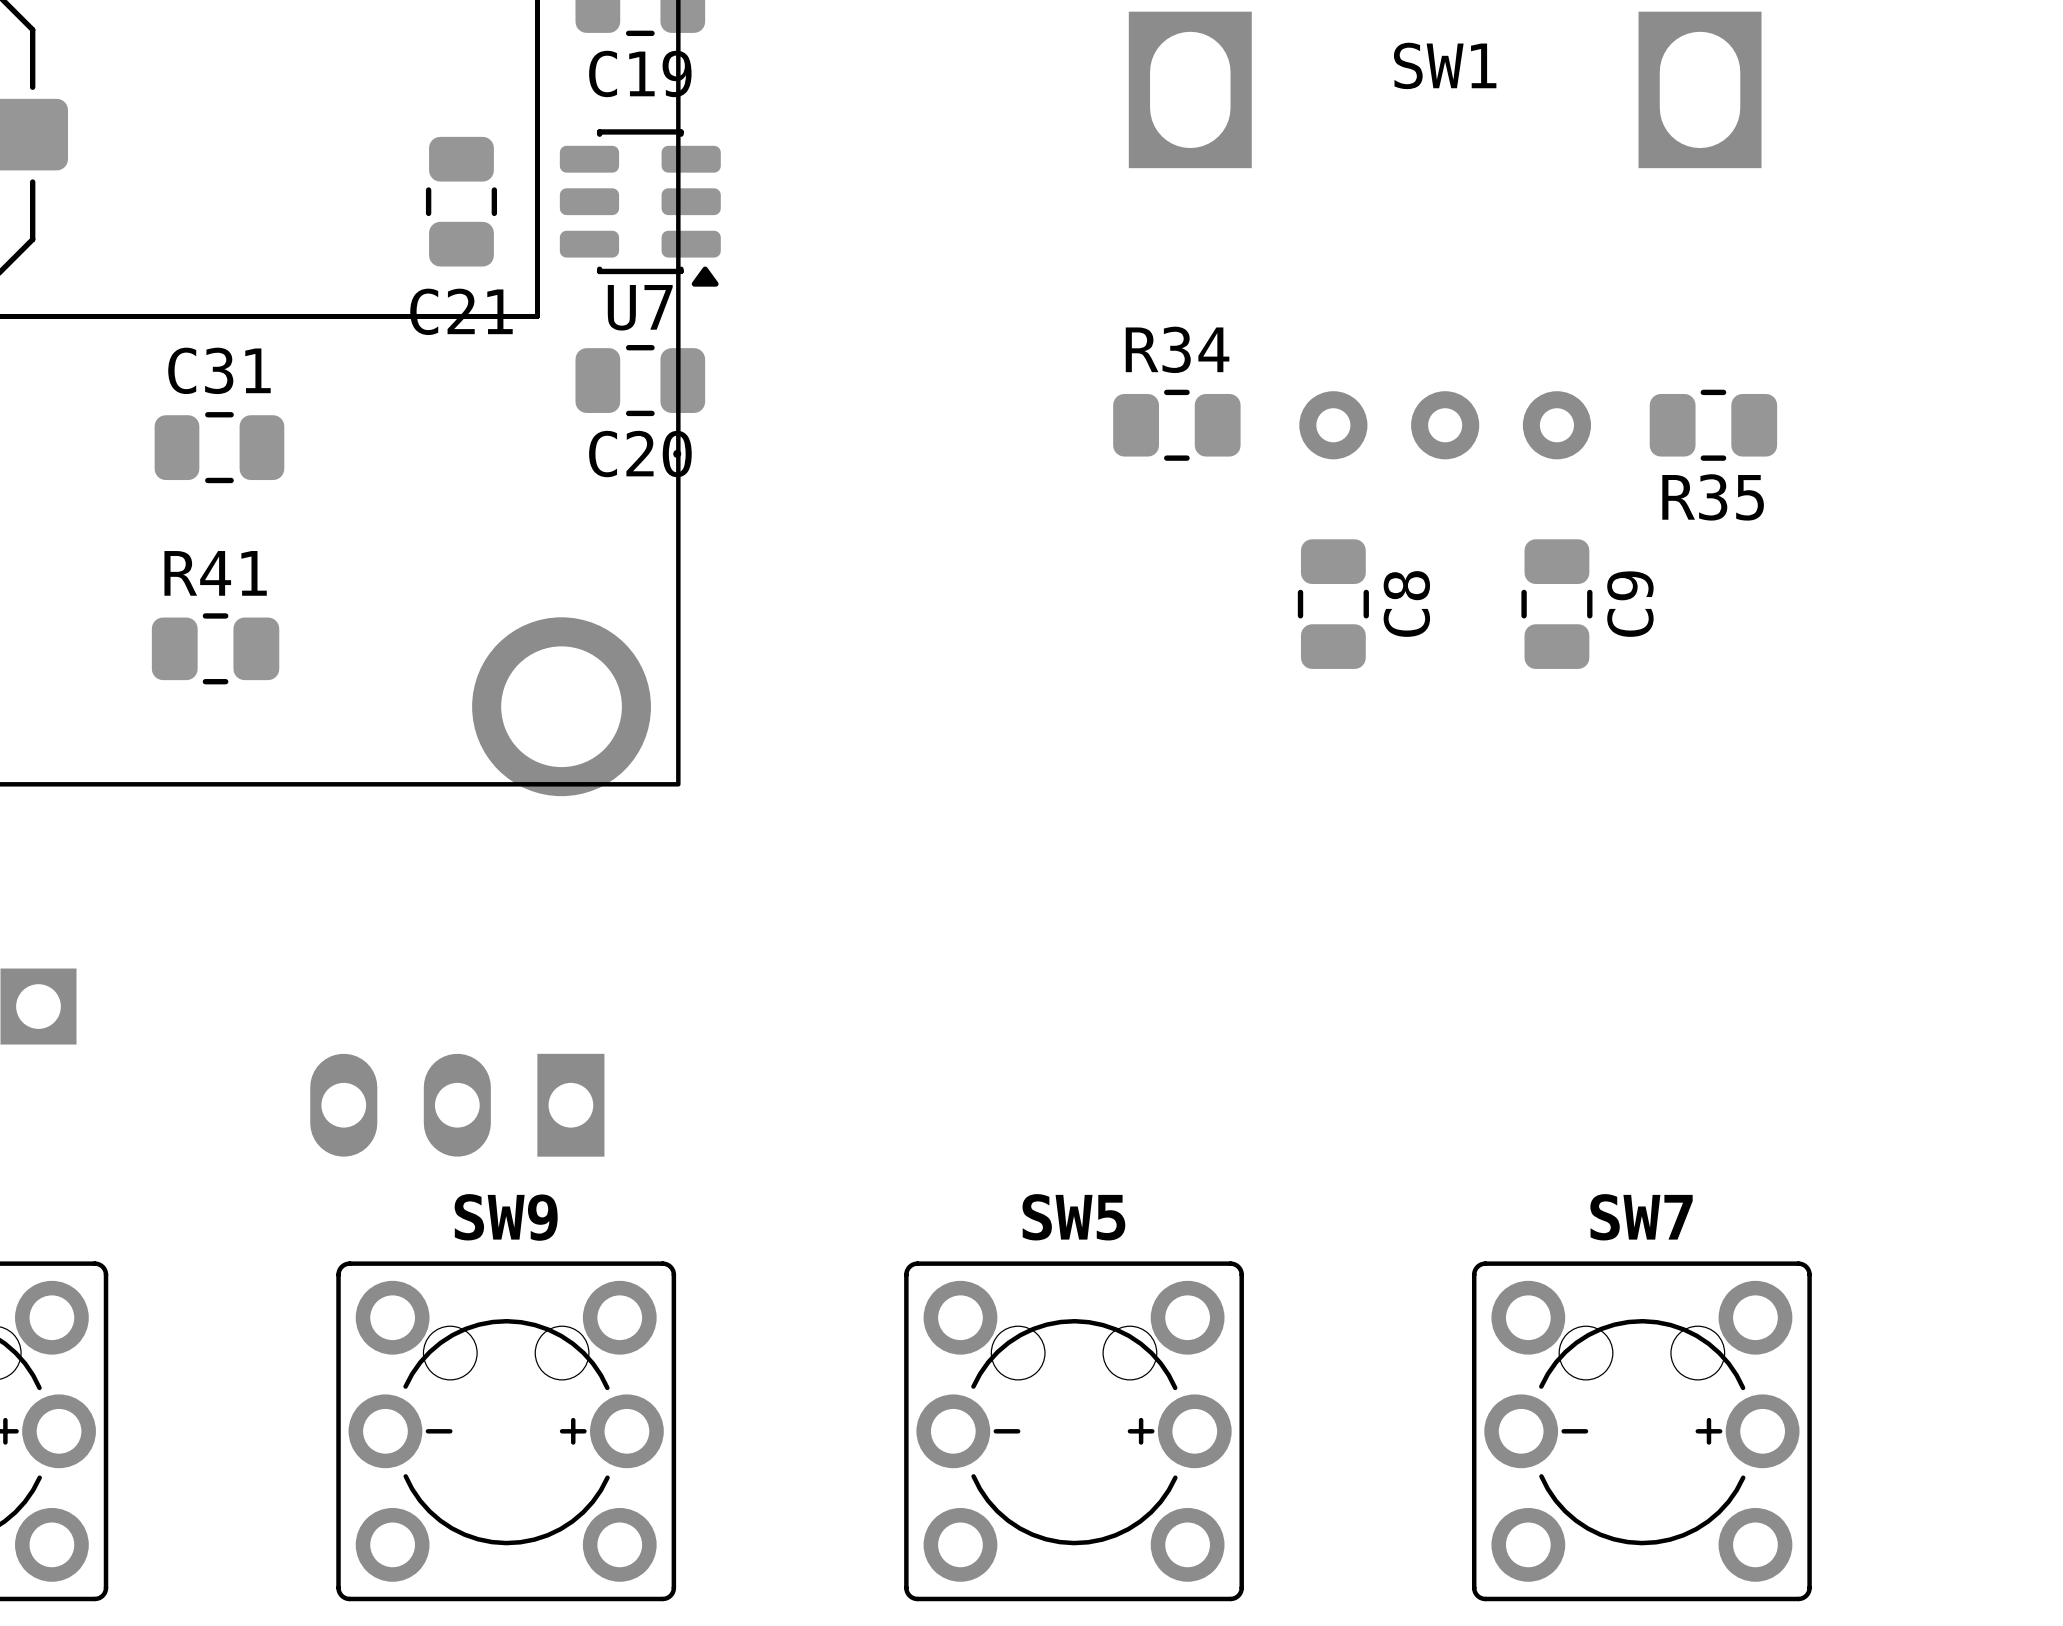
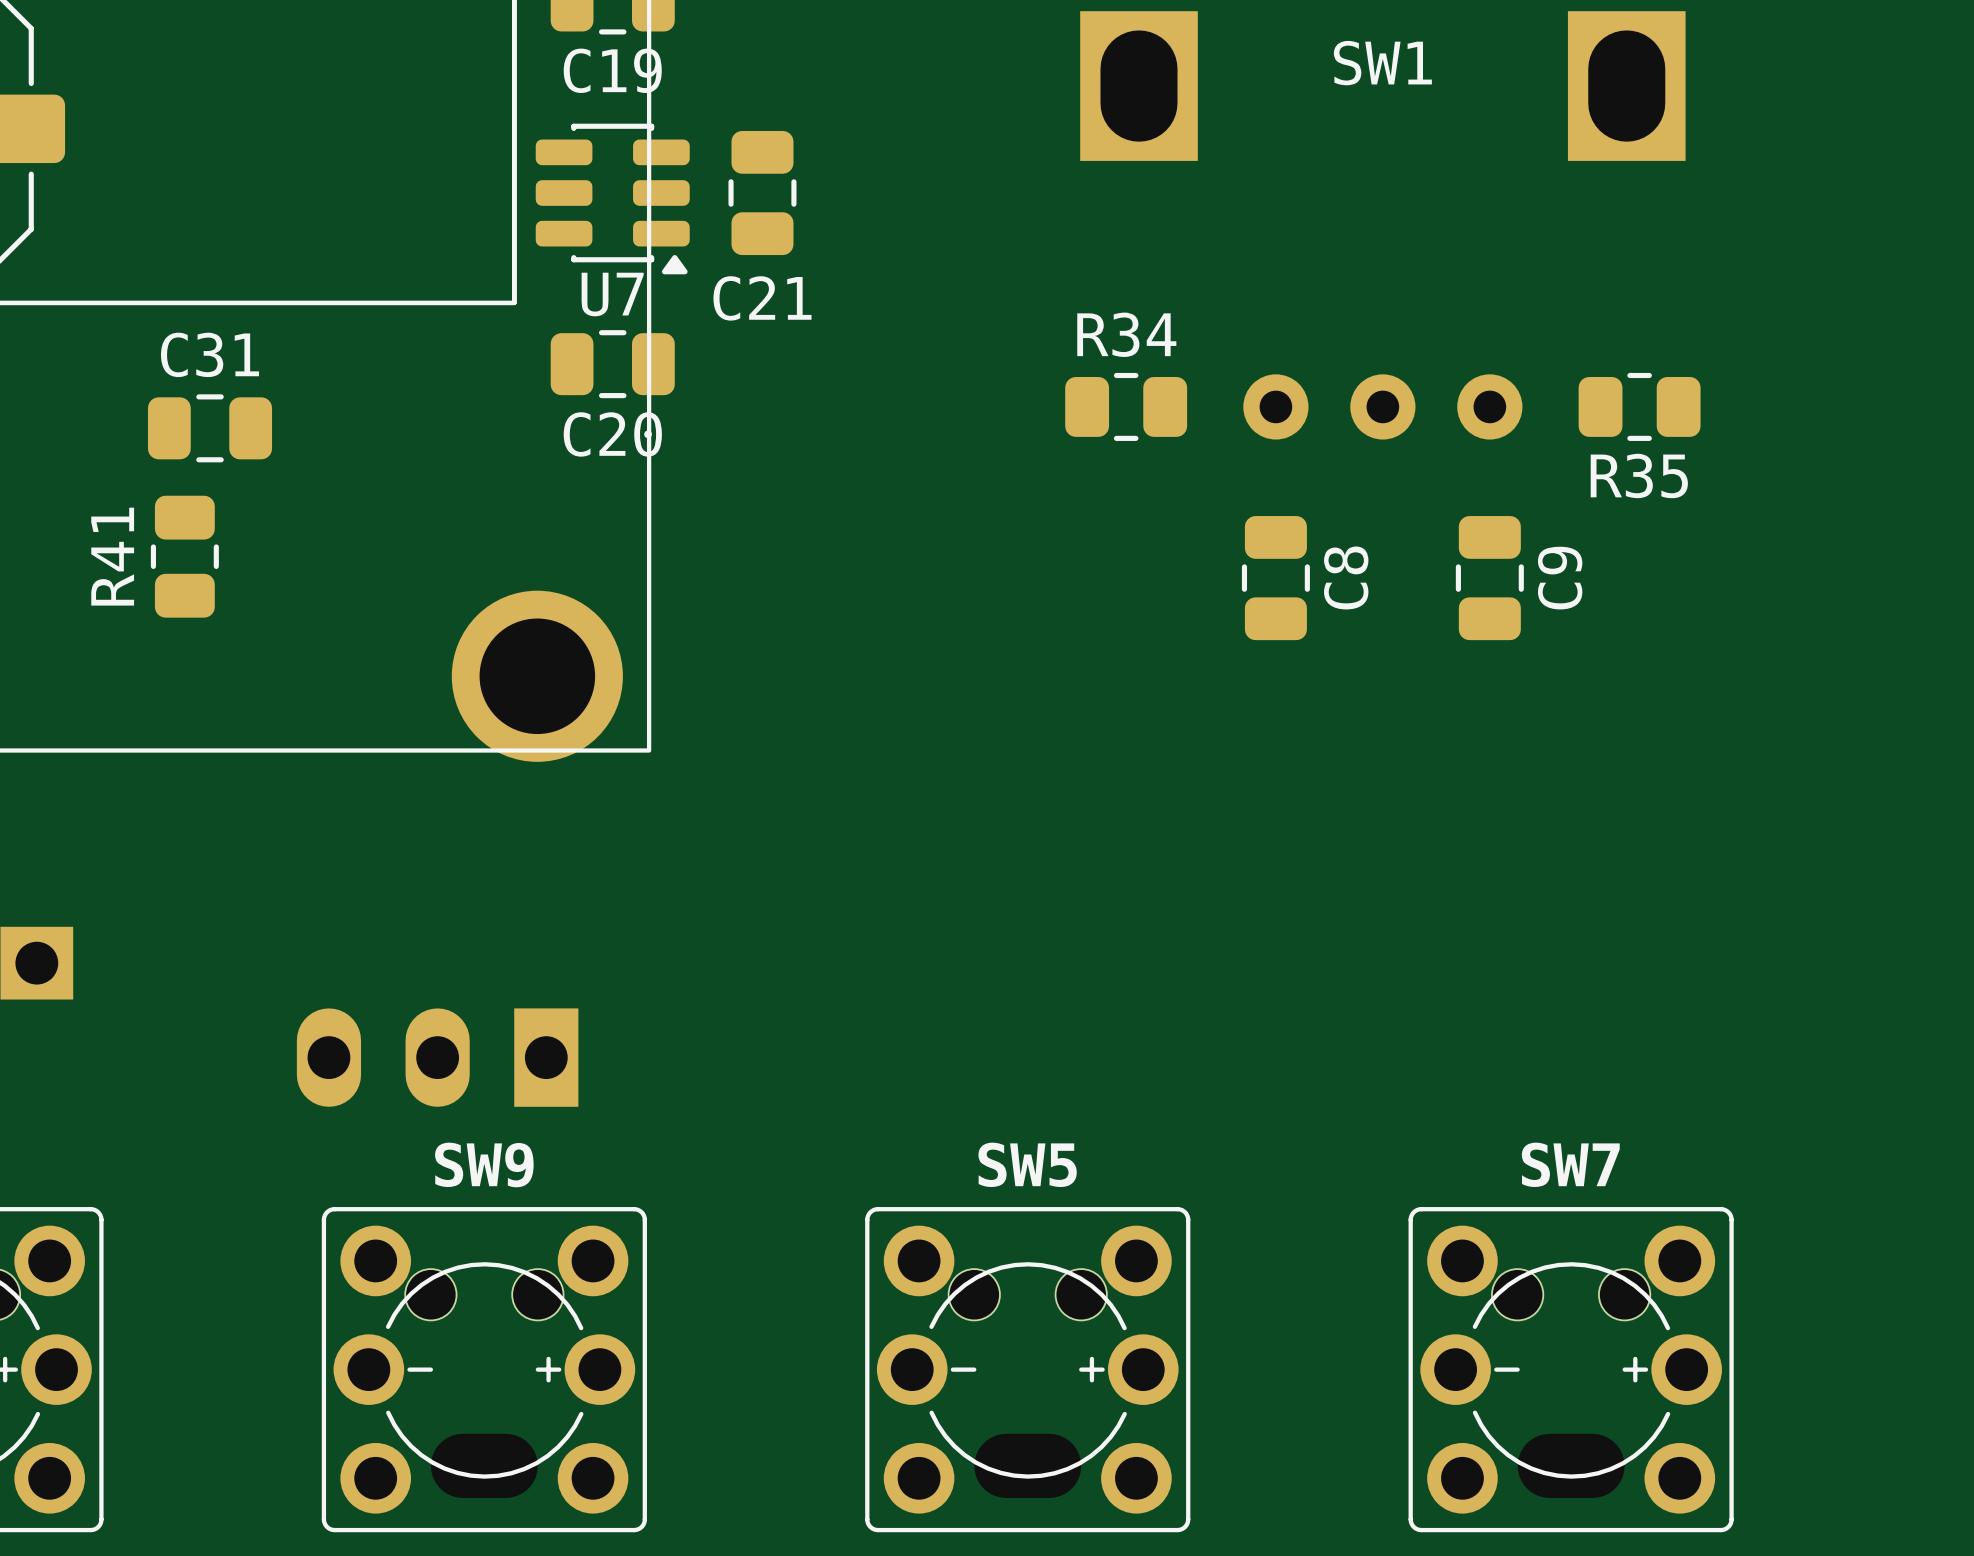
C21 position: (461, 201) -> (762, 193)
R41 name position: R41 (215, 573) -> R41 (112, 556)
R41 rotation: 0° (215, 648) -> 90° clockwise (184, 556)

